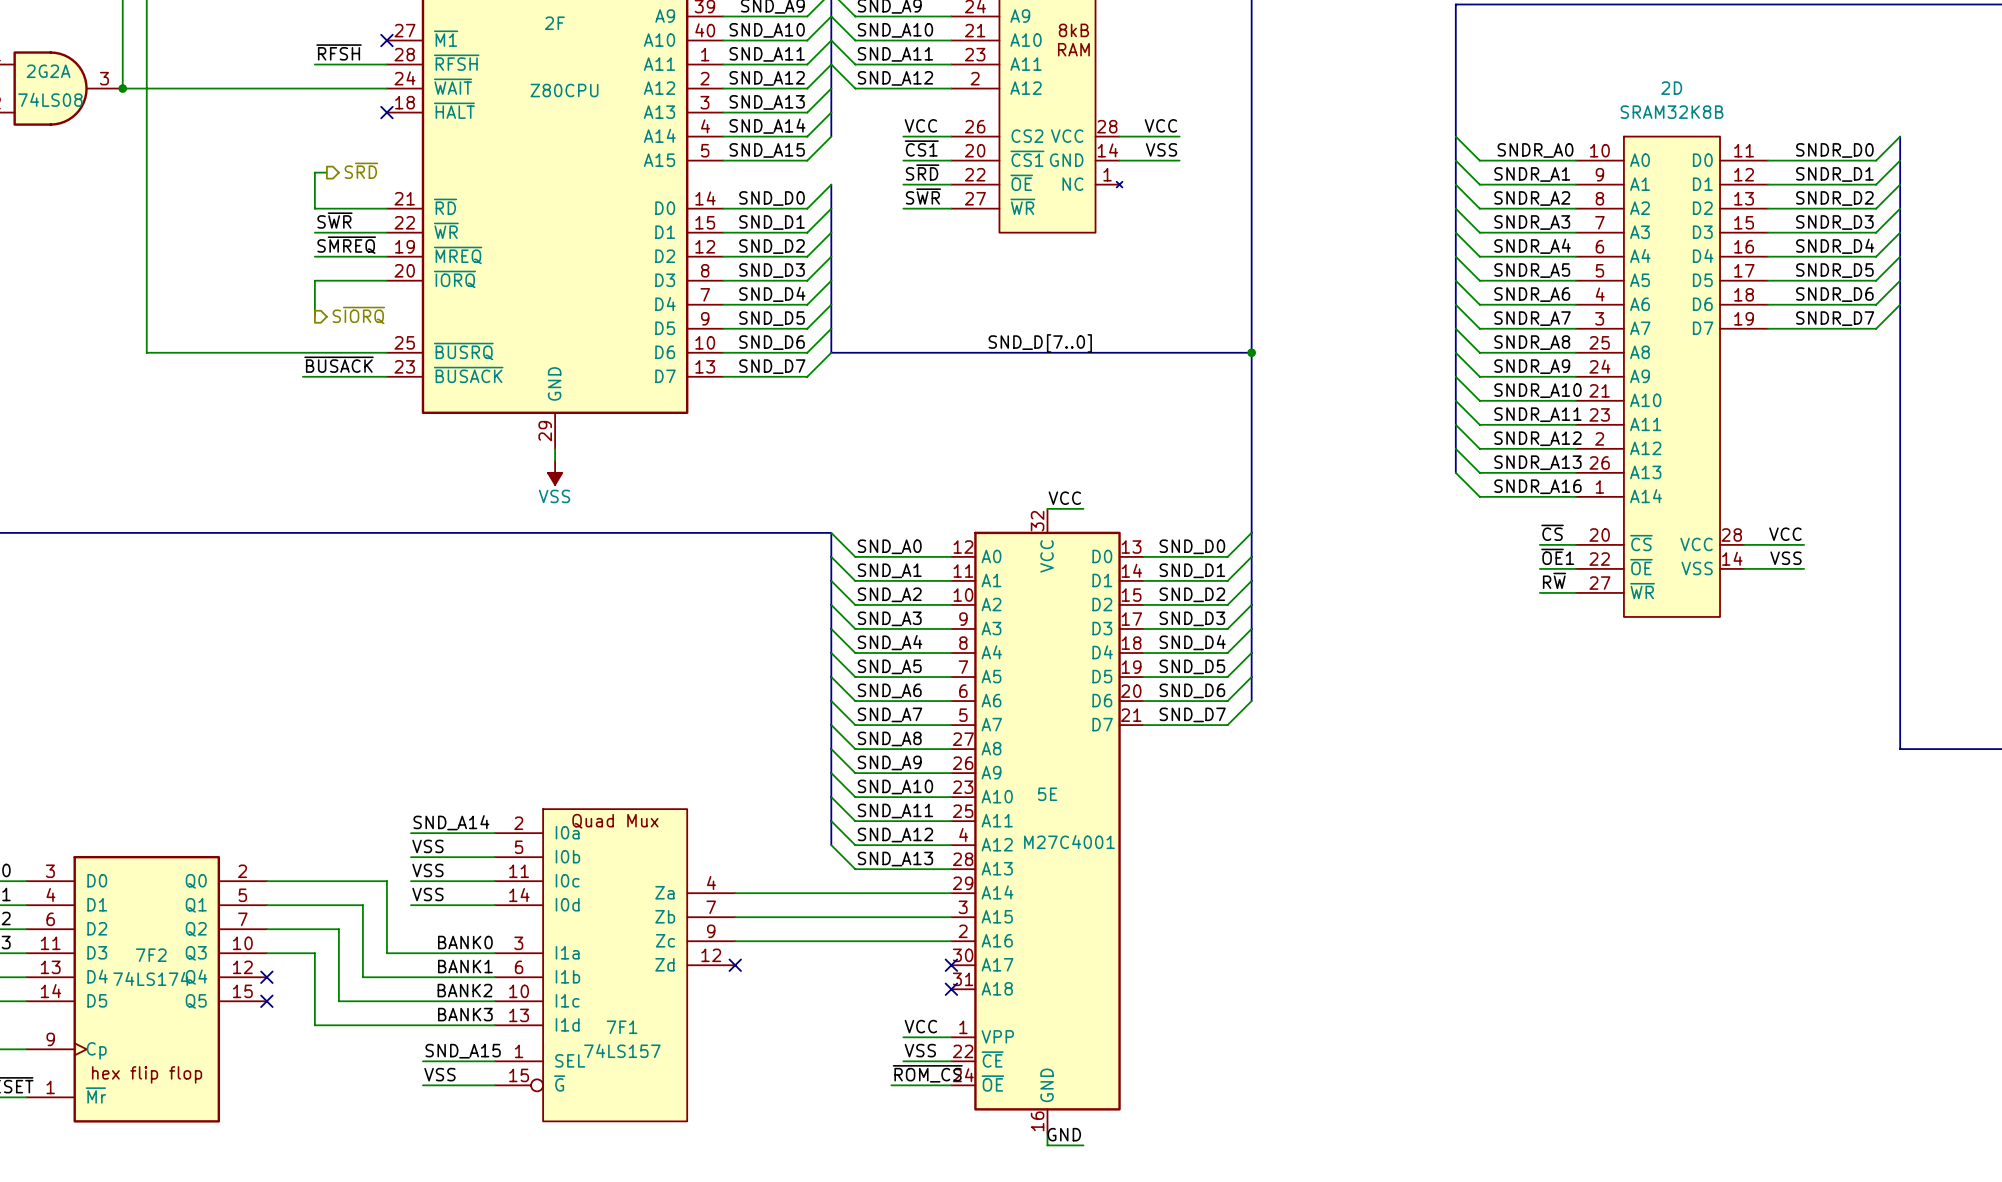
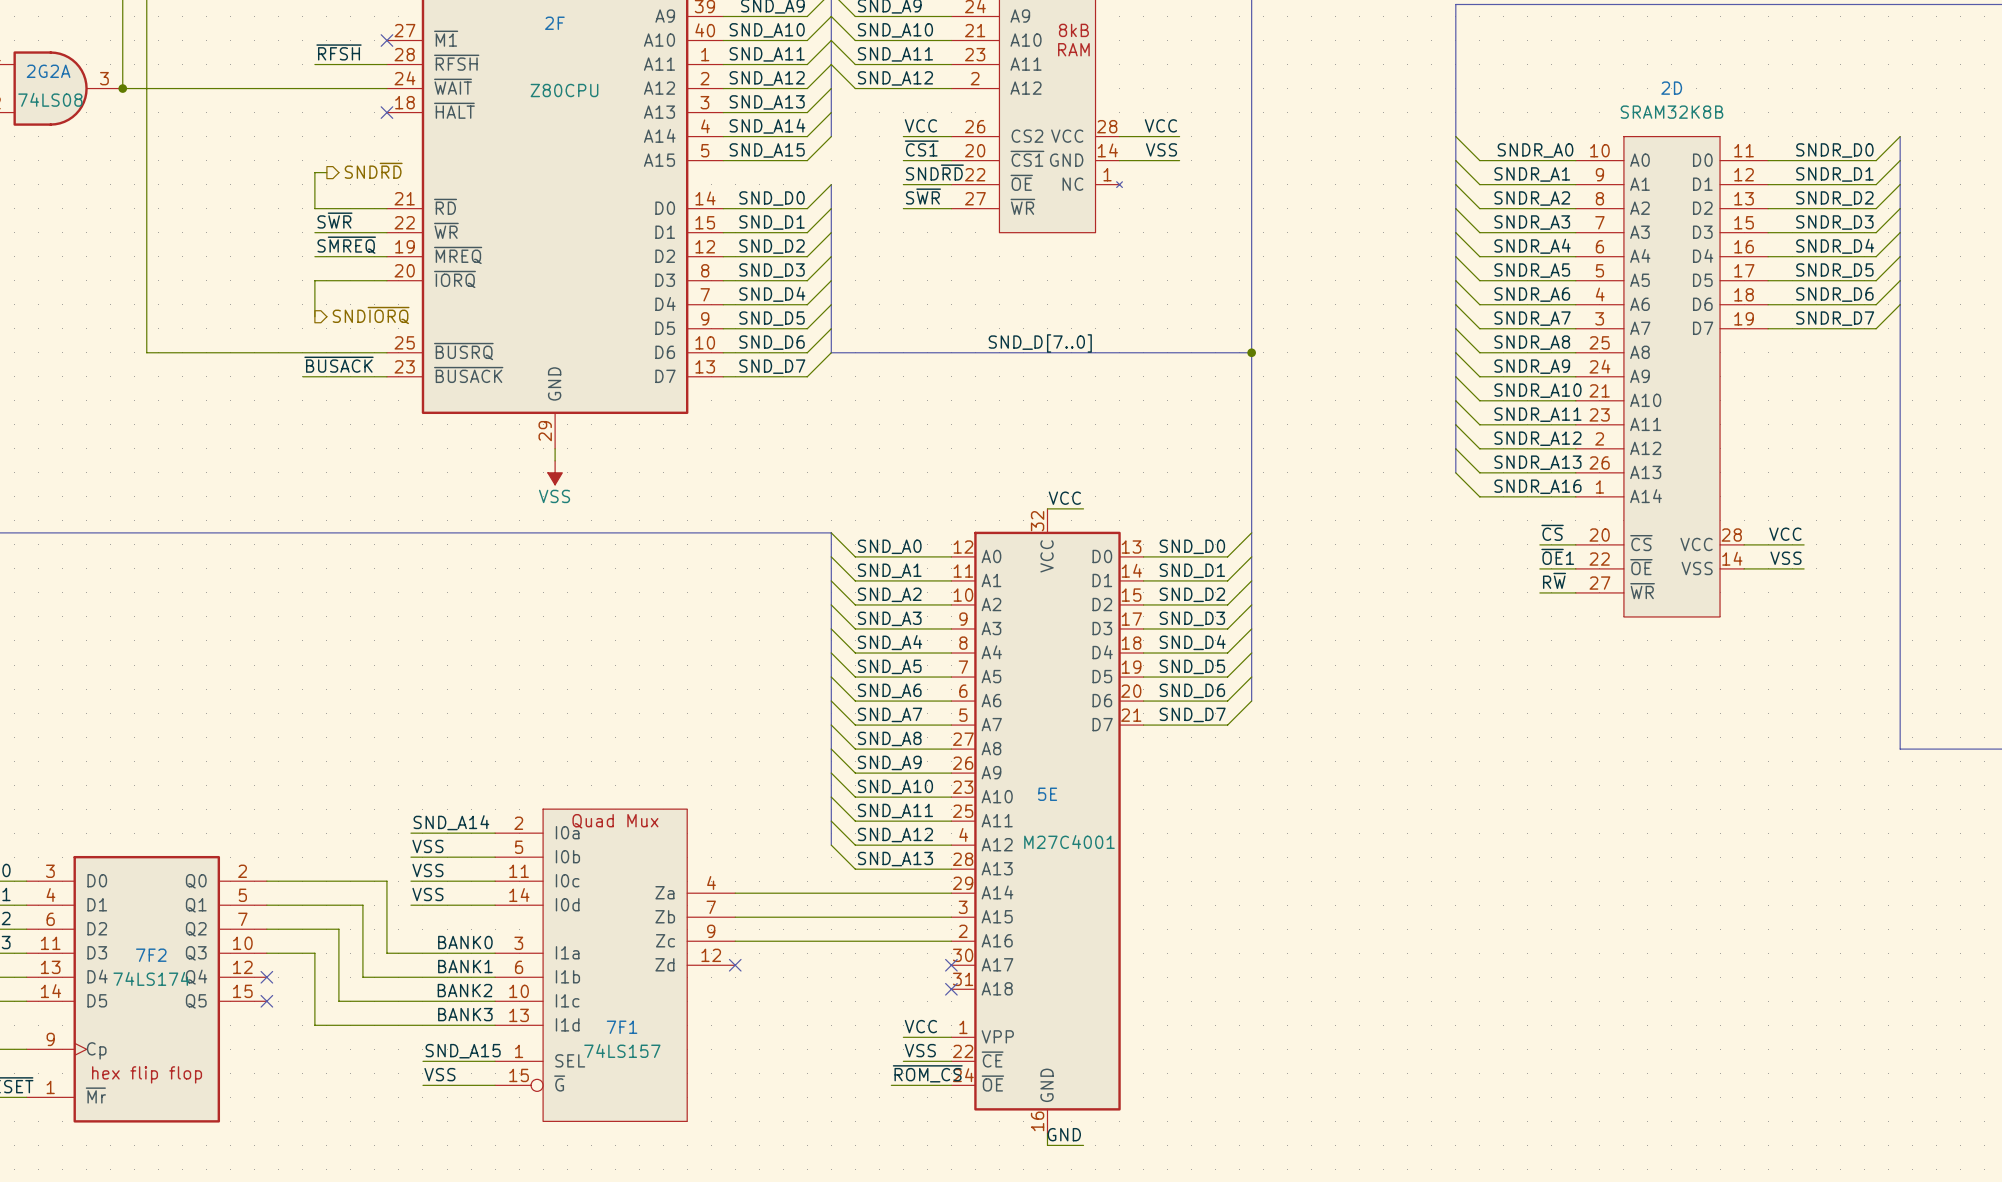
hierarchical label: S~{RD} (361, 170) -> SND~{RD} (373, 170)
label: S~{RD} (922, 172) -> SND~{RD} (934, 172)
hierarchical label: S~{IORQ} (358, 315) -> SND~{IORQ} (371, 315)

